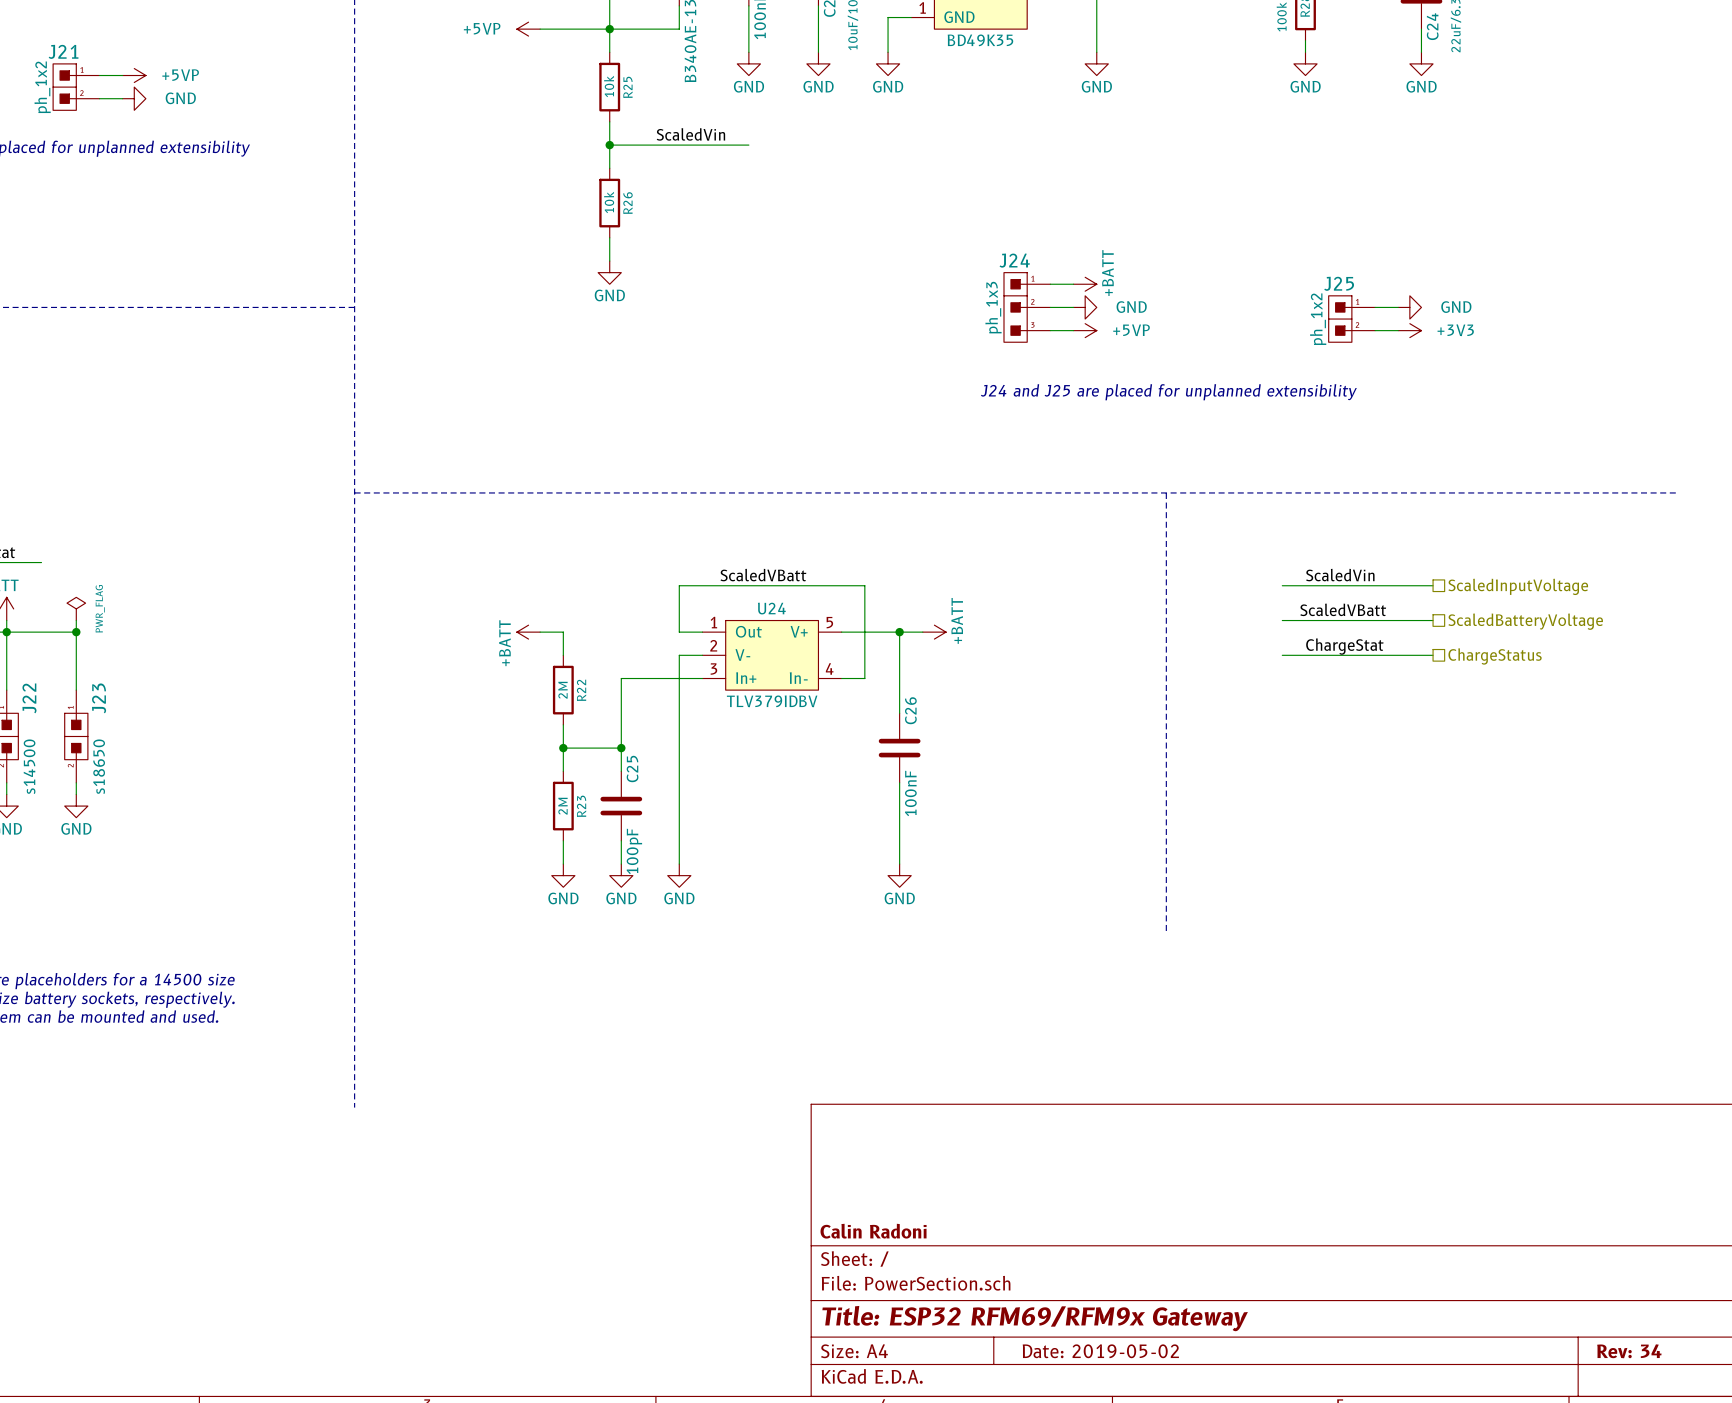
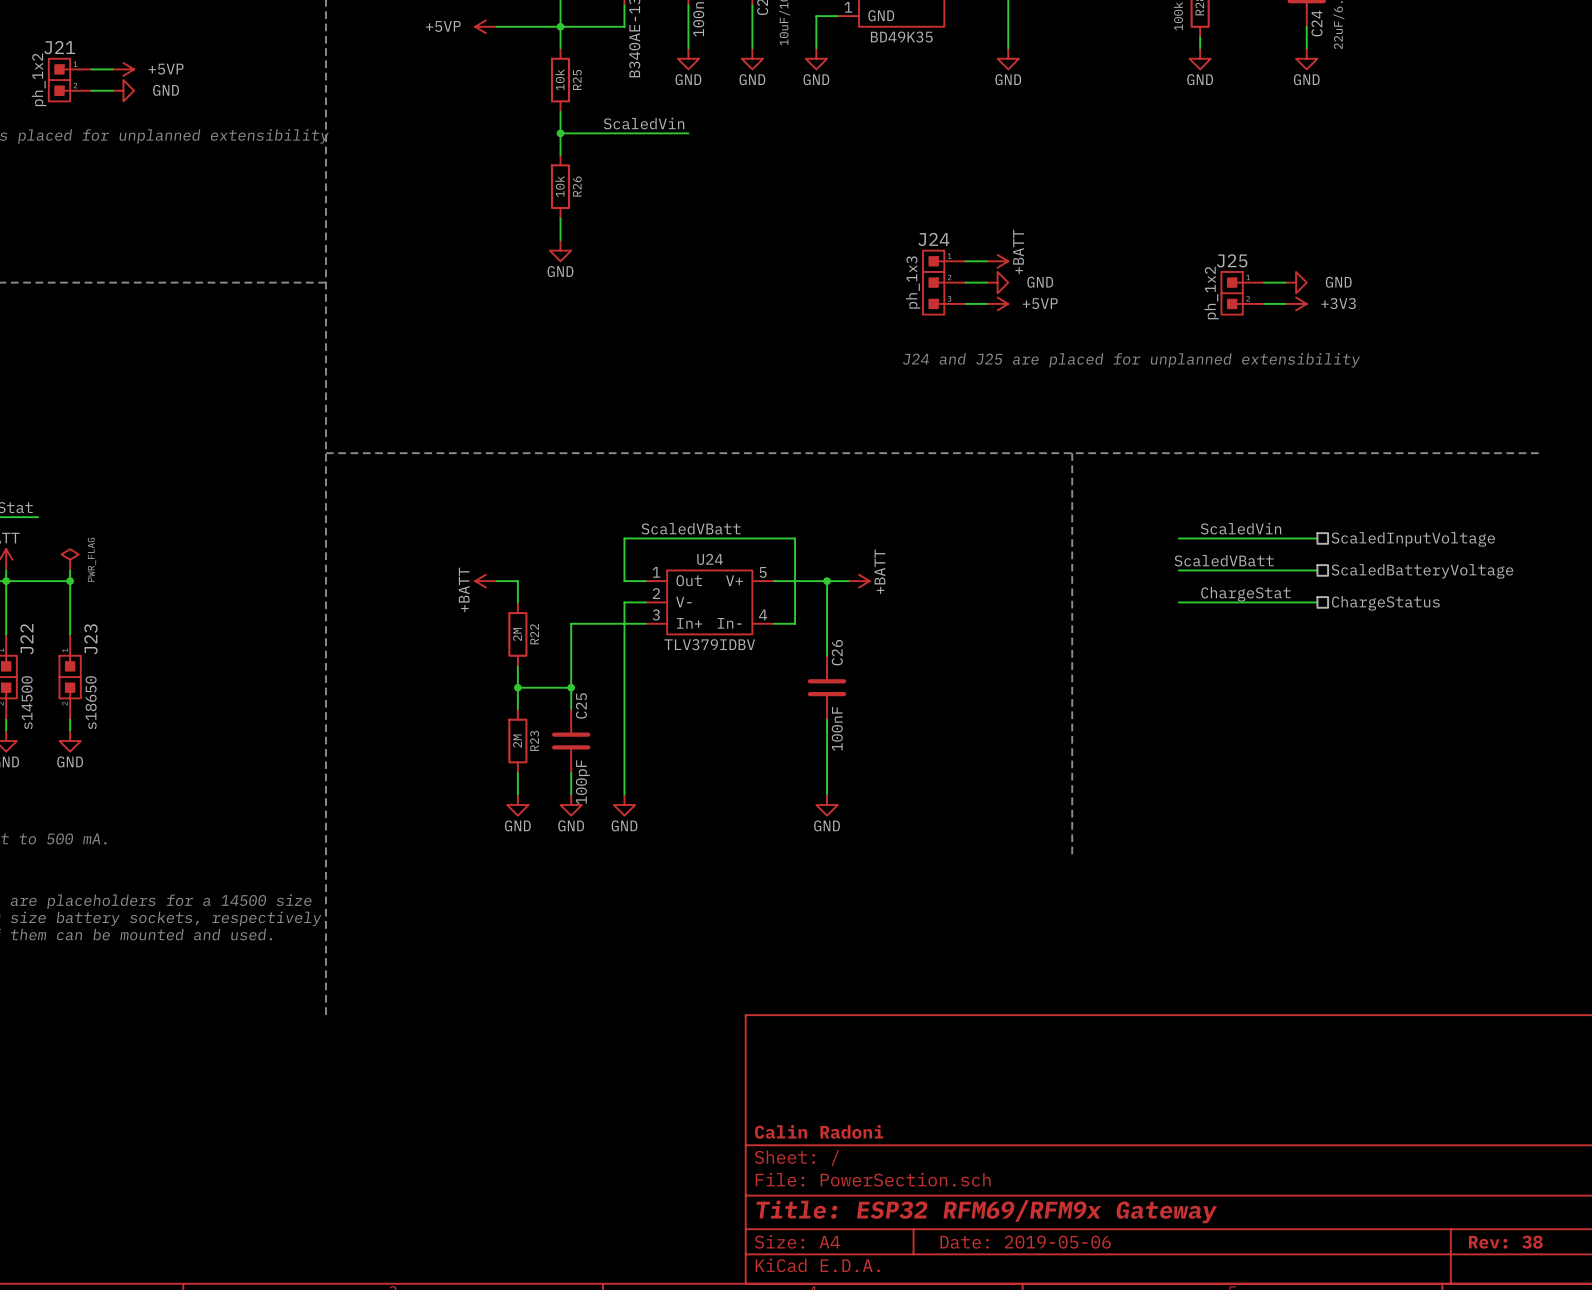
title block: Date: 2019-05-02 (1100, 1351) -> Date: 2019-05-06 (1025, 1242)
title block: Rev: 34 (1629, 1351) -> Rev: 38 (1505, 1242)

